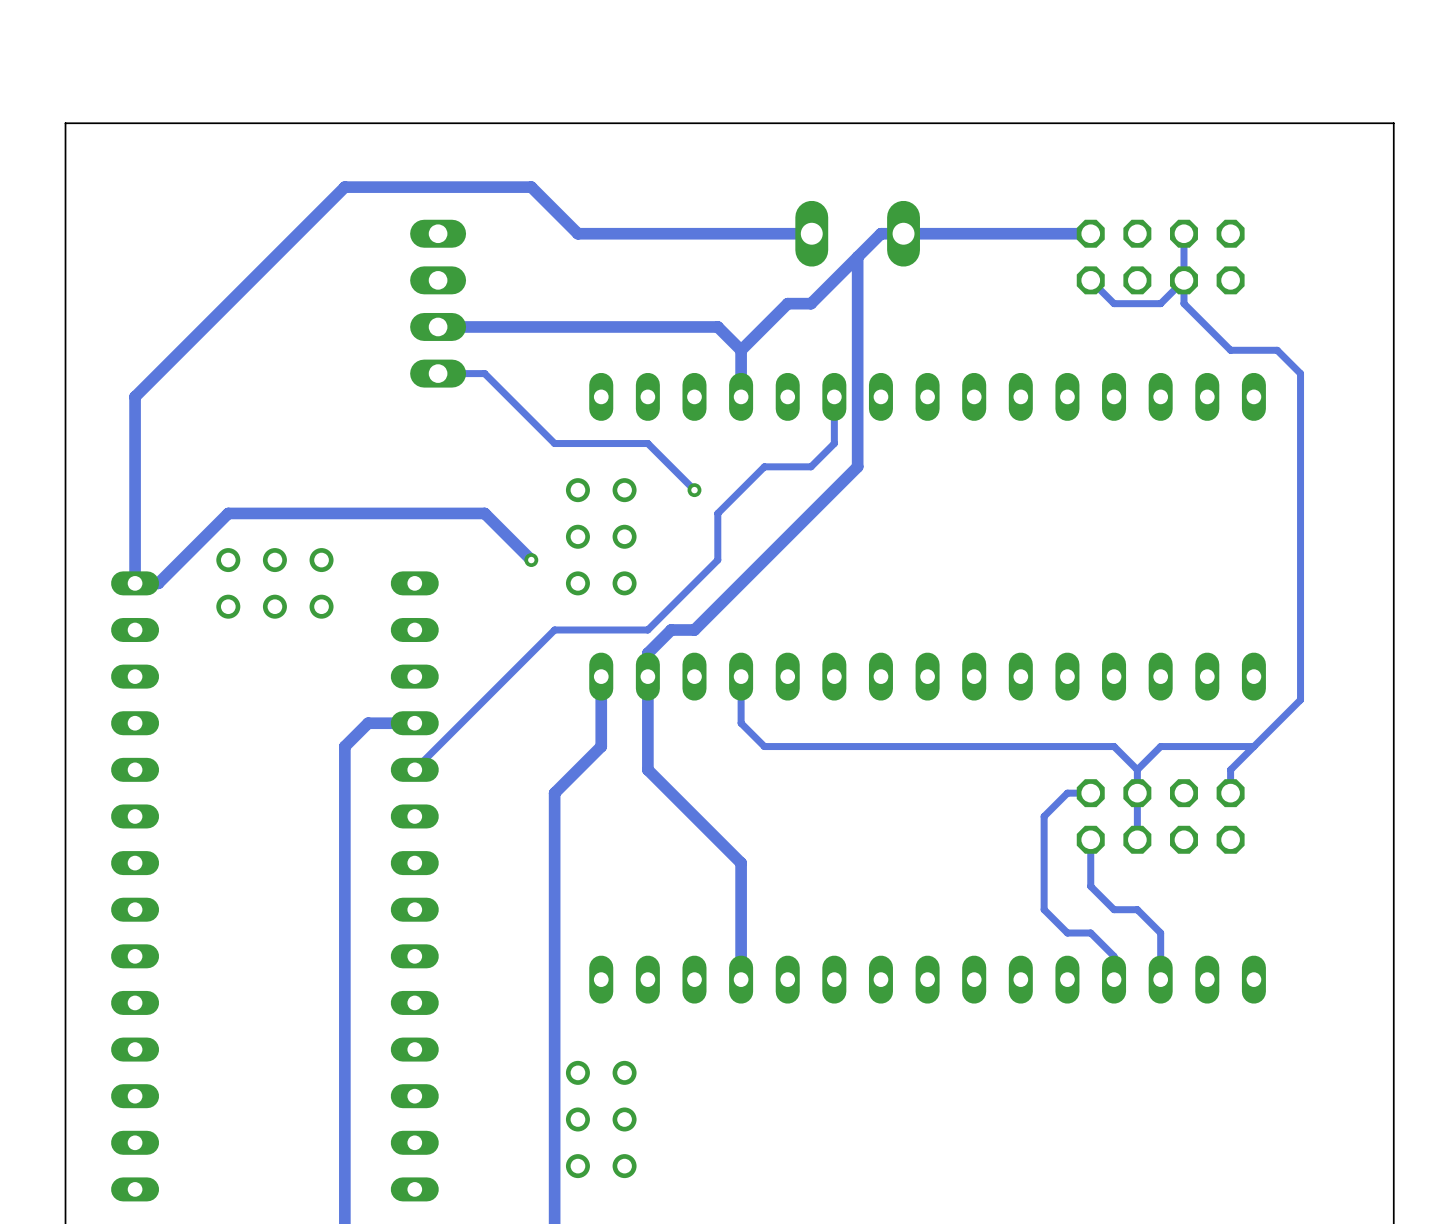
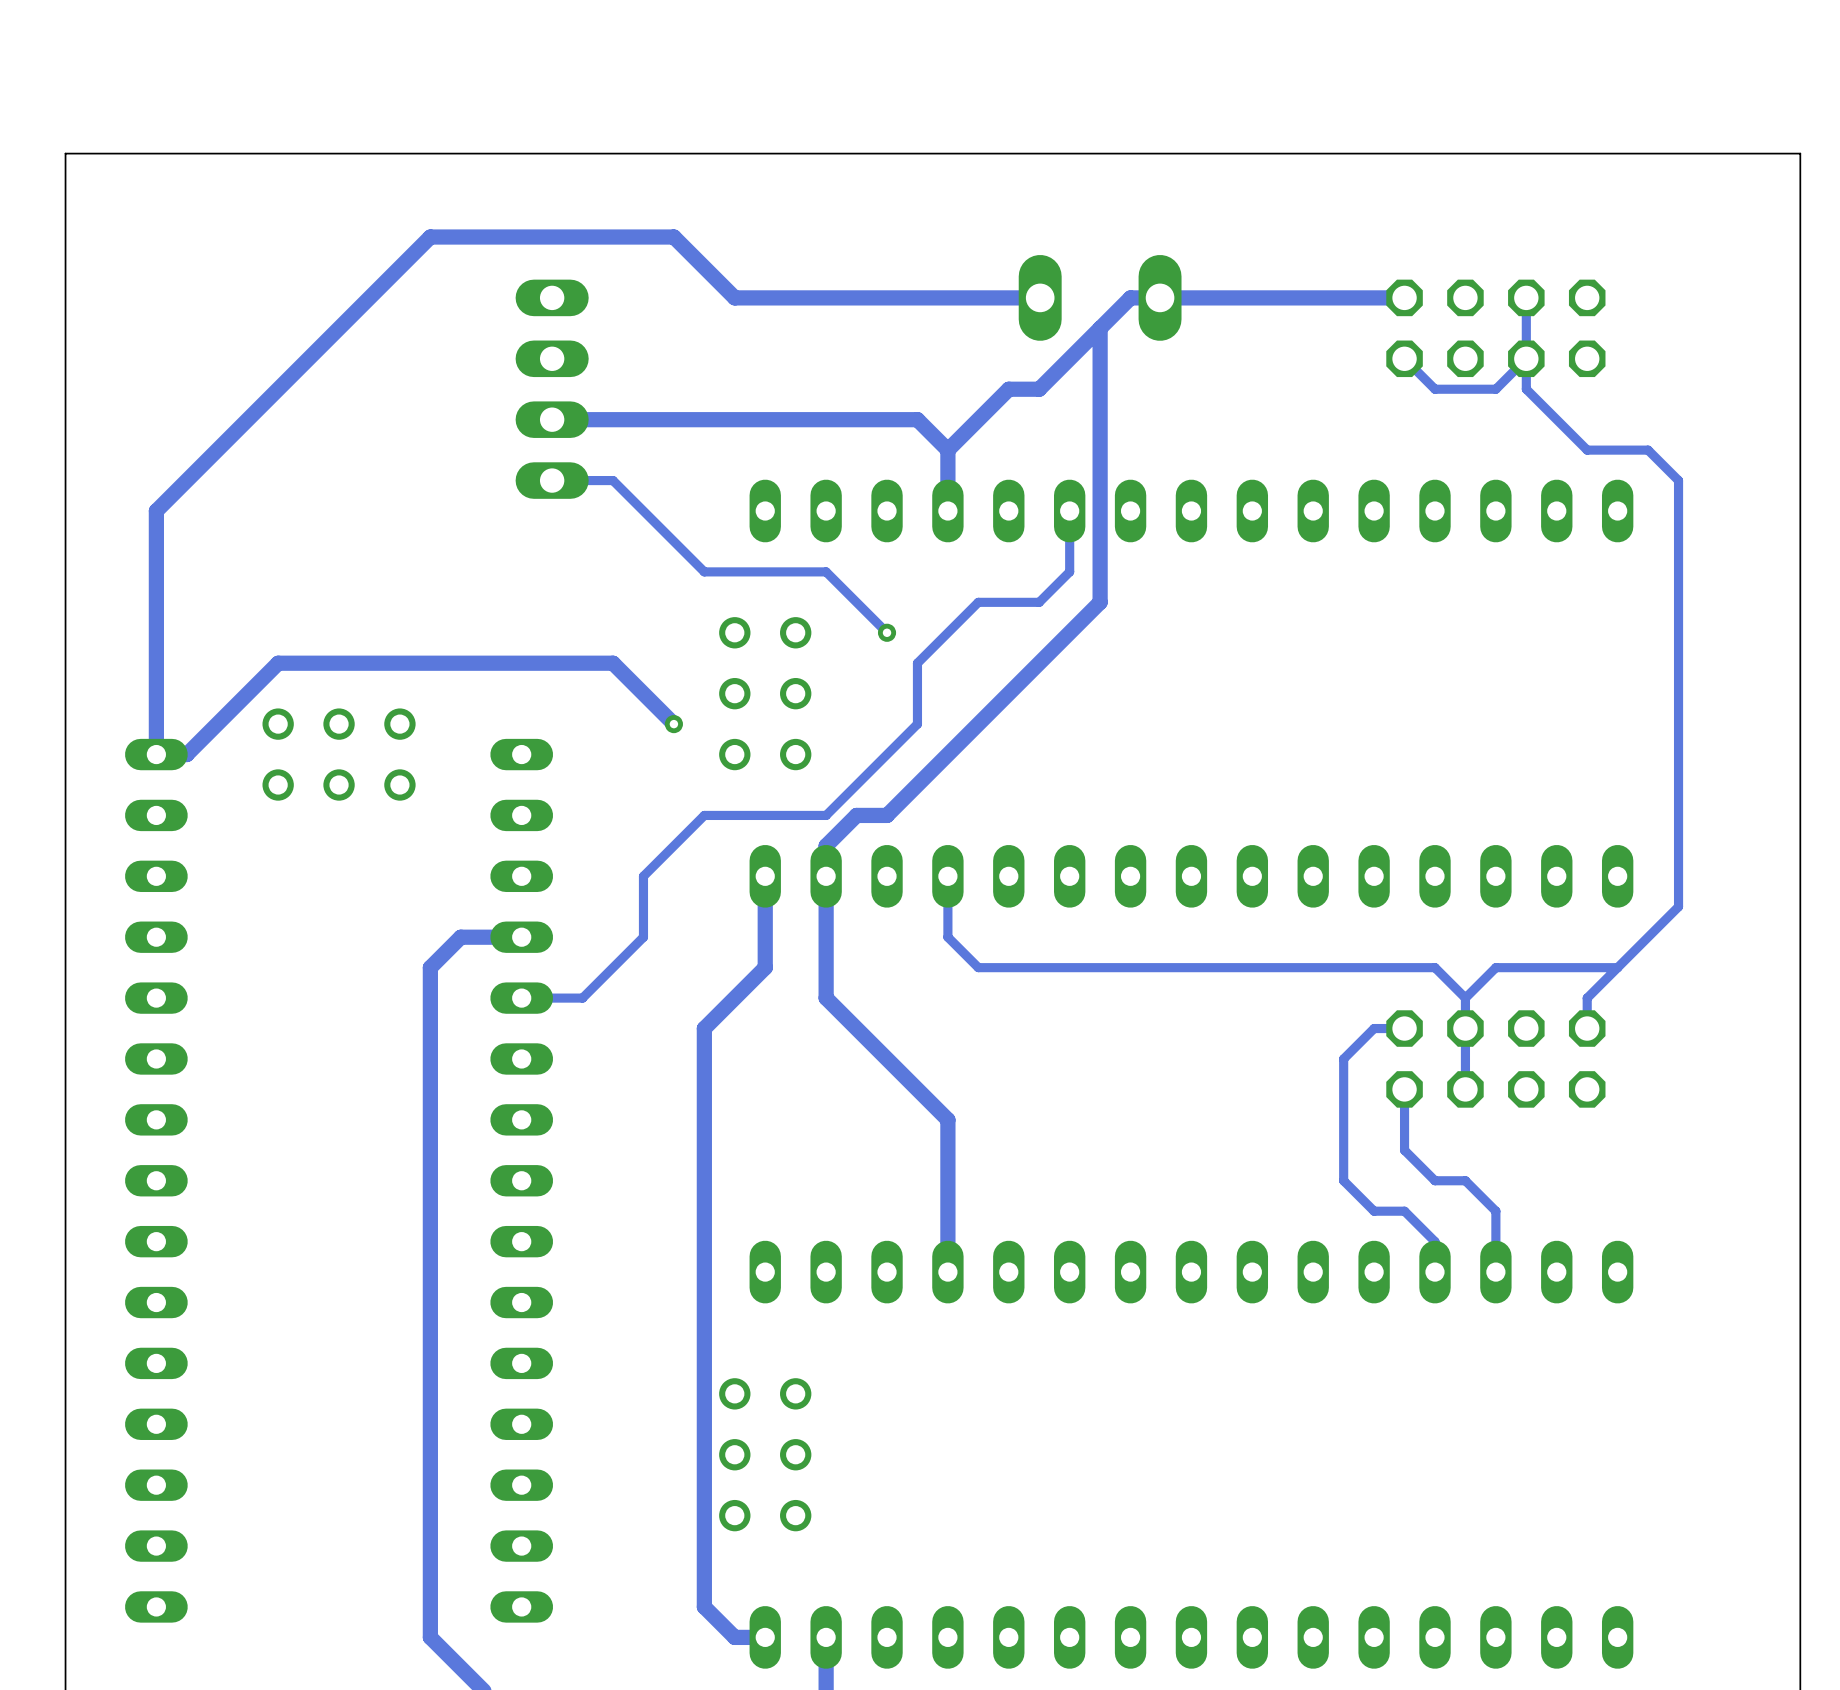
track: (508, 676) (414, 769) -> (643, 876) (643, 937) (582, 998) (521, 998)

